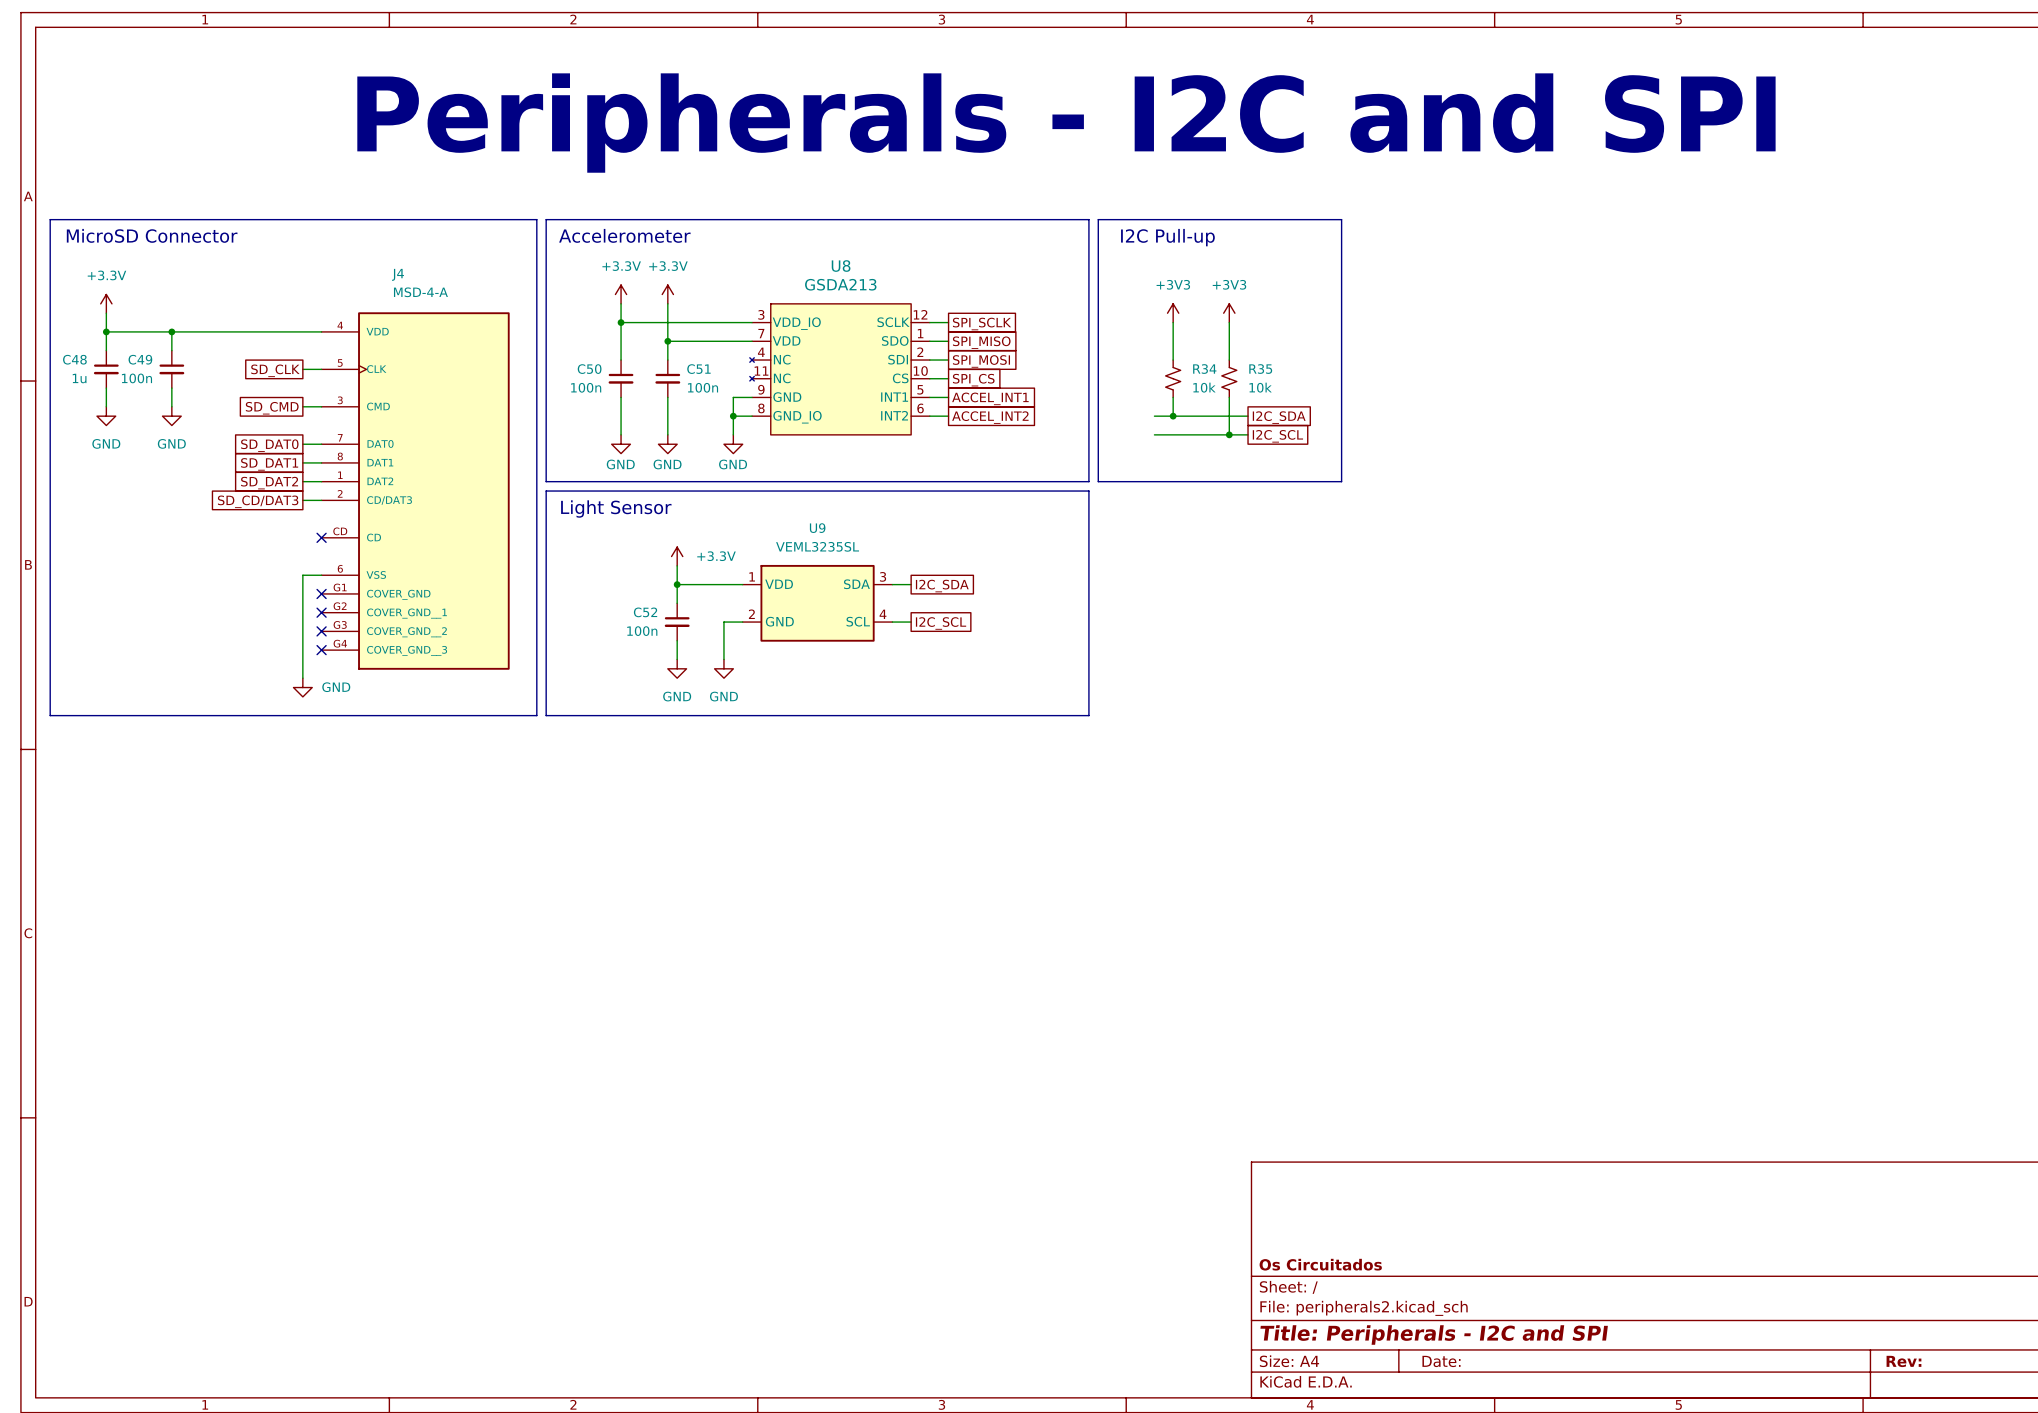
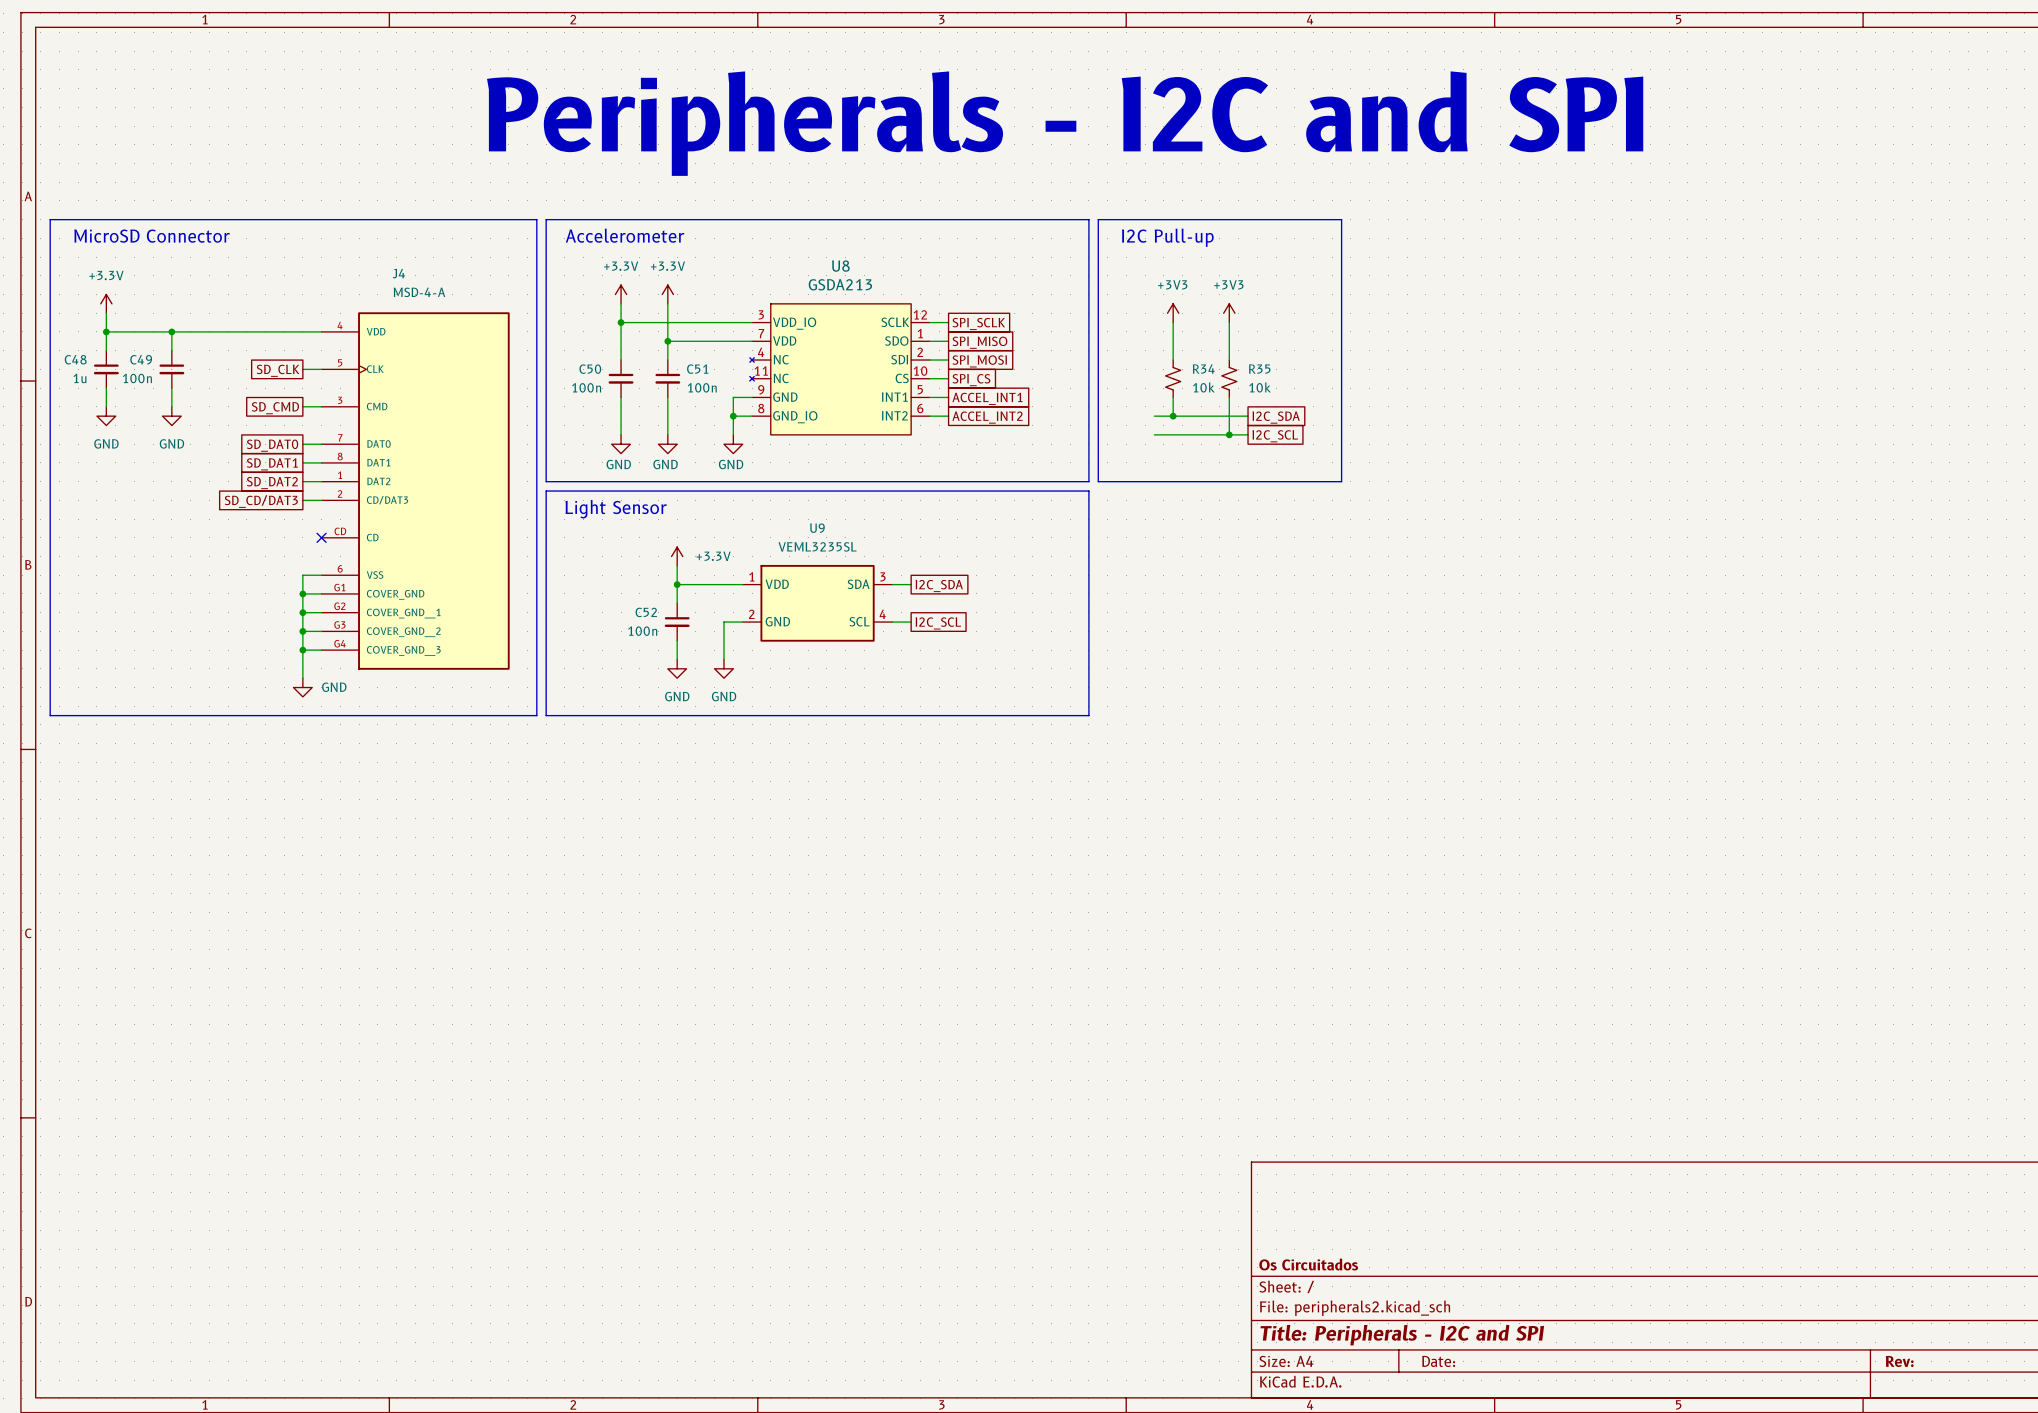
wire: none -> (302, 593) (321, 593)
junction: none -> (302, 593)
no-connect mark: (321, 593) -> none
wire: none -> (302, 612) (321, 612)
junction: none -> (302, 612)
no-connect mark: (321, 612) -> none
wire: none -> (302, 631) (321, 631)
junction: none -> (302, 631)
no-connect mark: (321, 631) -> none
wire: none -> (302, 650) (321, 650)
junction: none -> (302, 650)
no-connect mark: (321, 650) -> none

